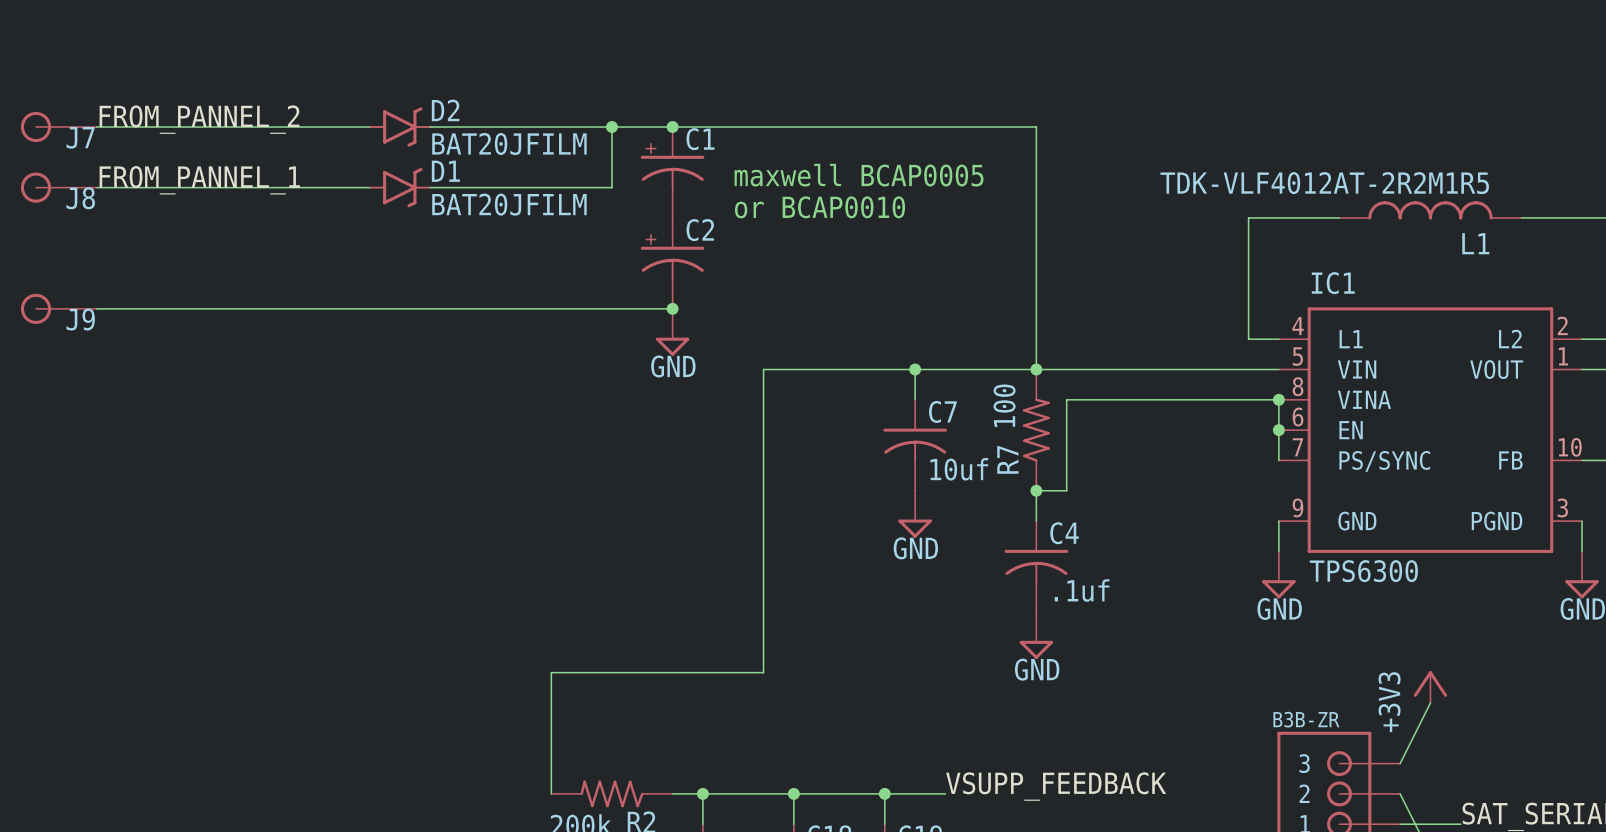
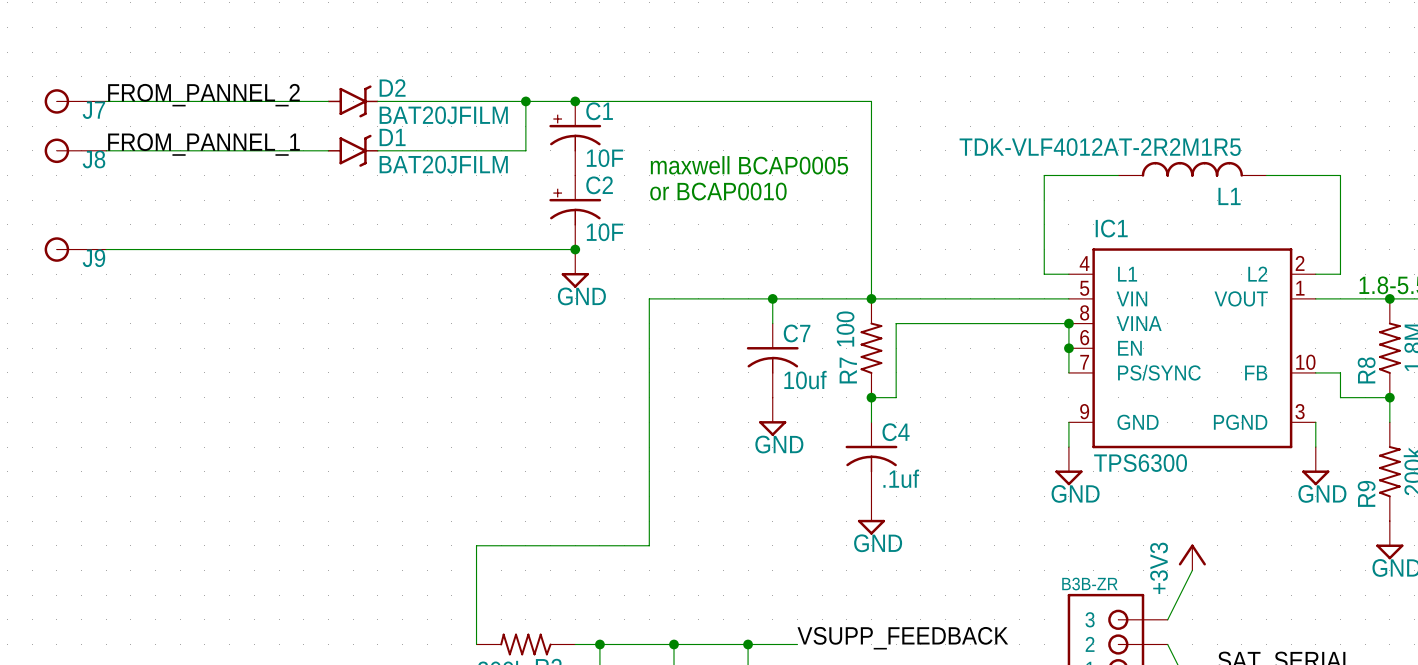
text position: maxwell BCAP0005 (859, 175) -> maxwell BCAP0005 (749, 165)
C1 value: none -> 10F (605, 158)
text position: or BCAP0010 (820, 207) -> or BCAP0010 (718, 191)
C2 value: none -> 10F (605, 232)

